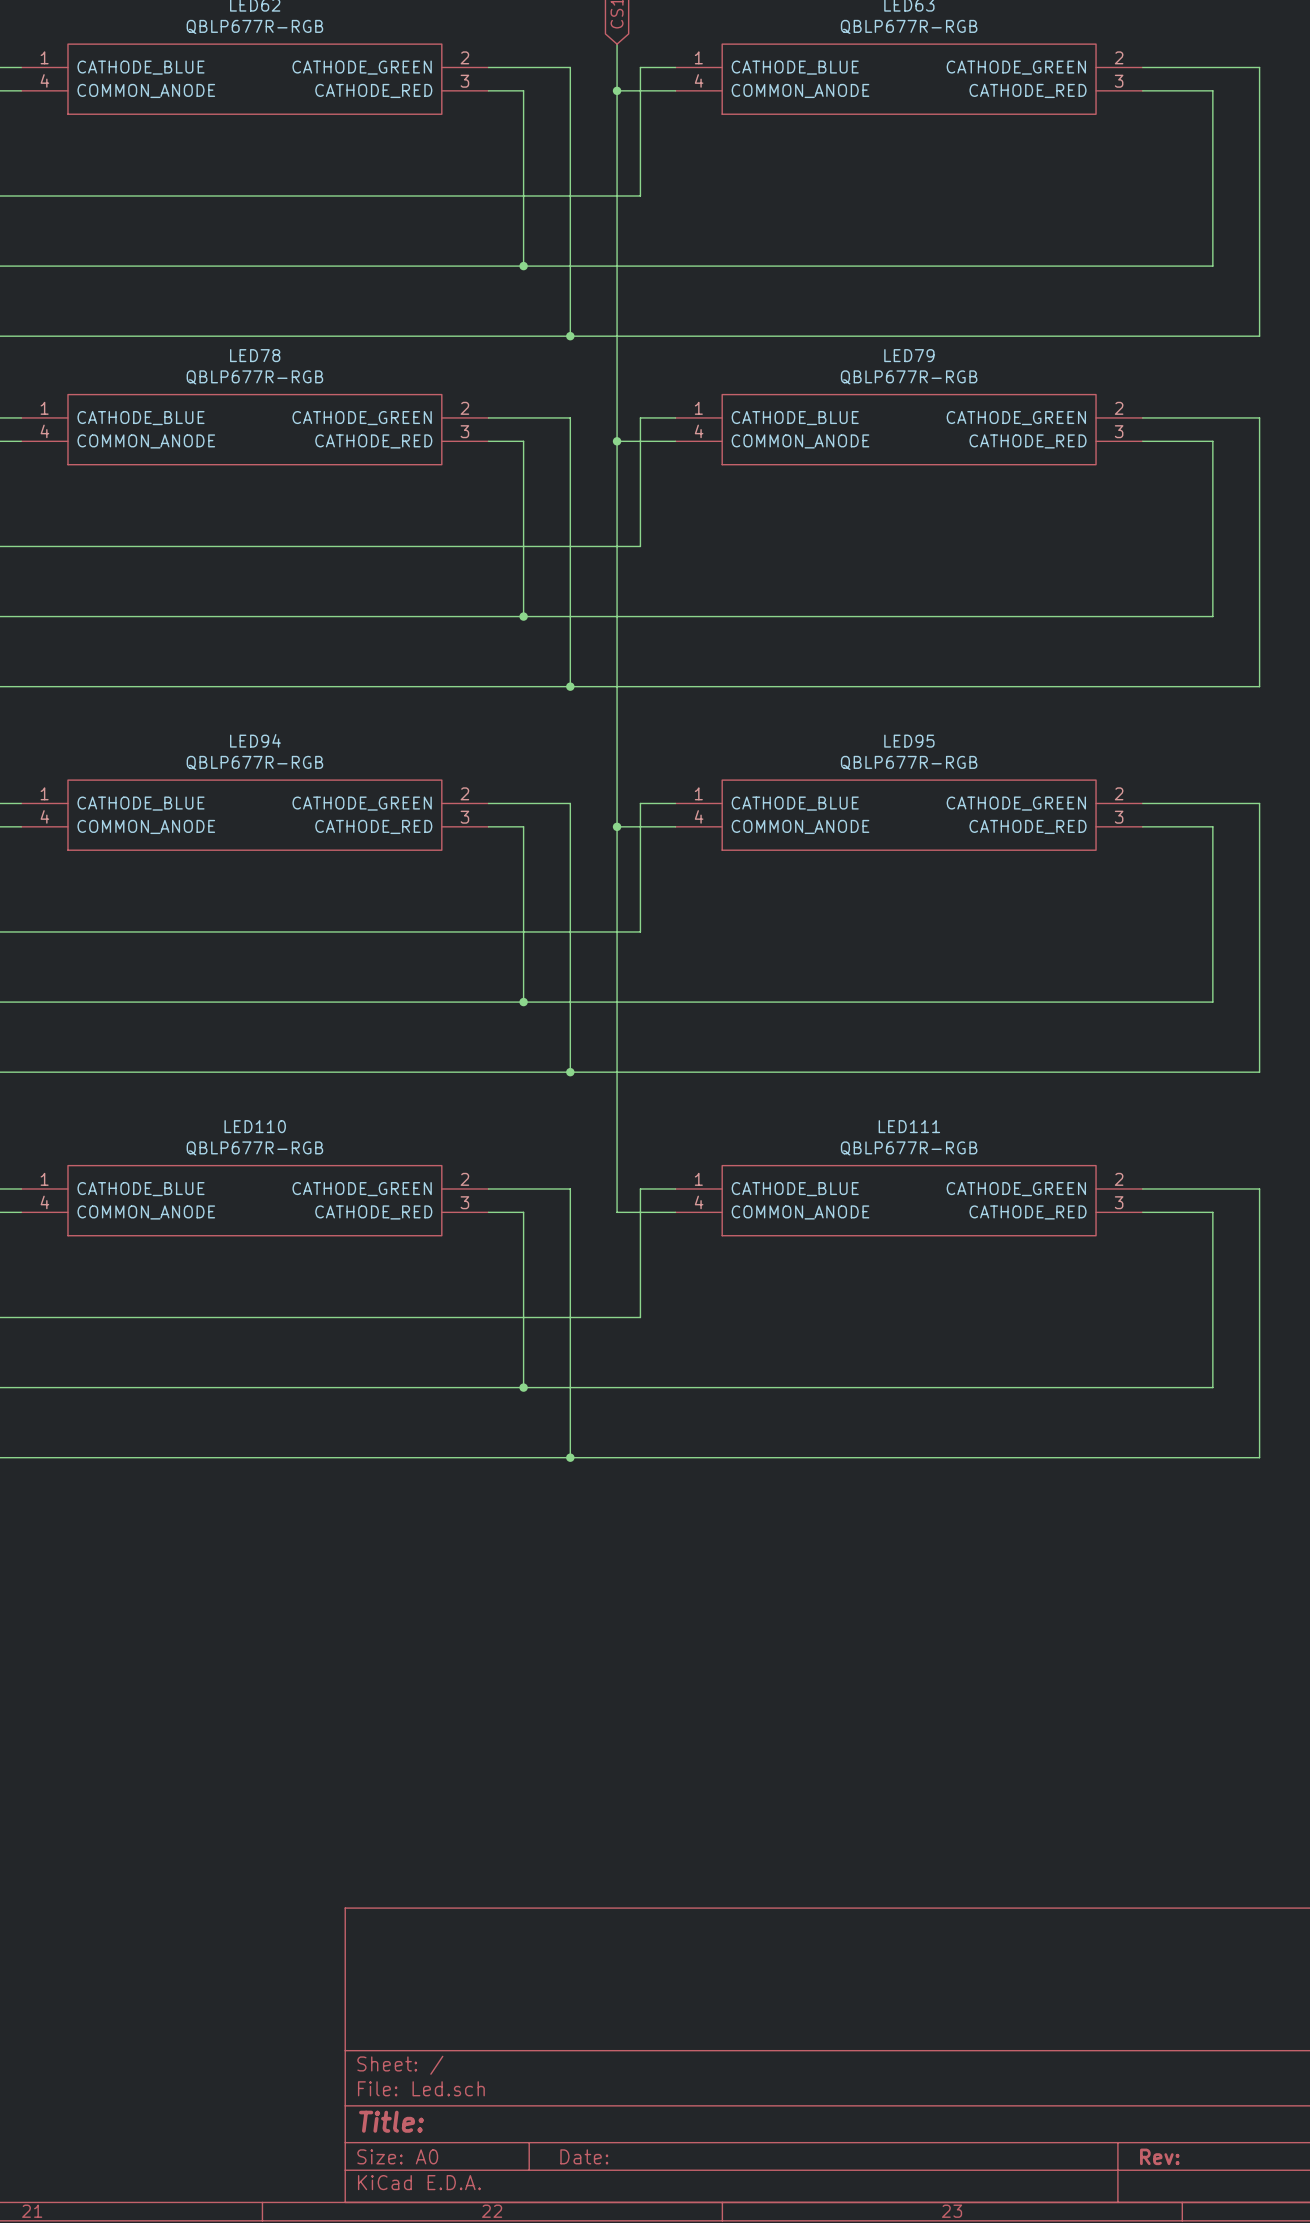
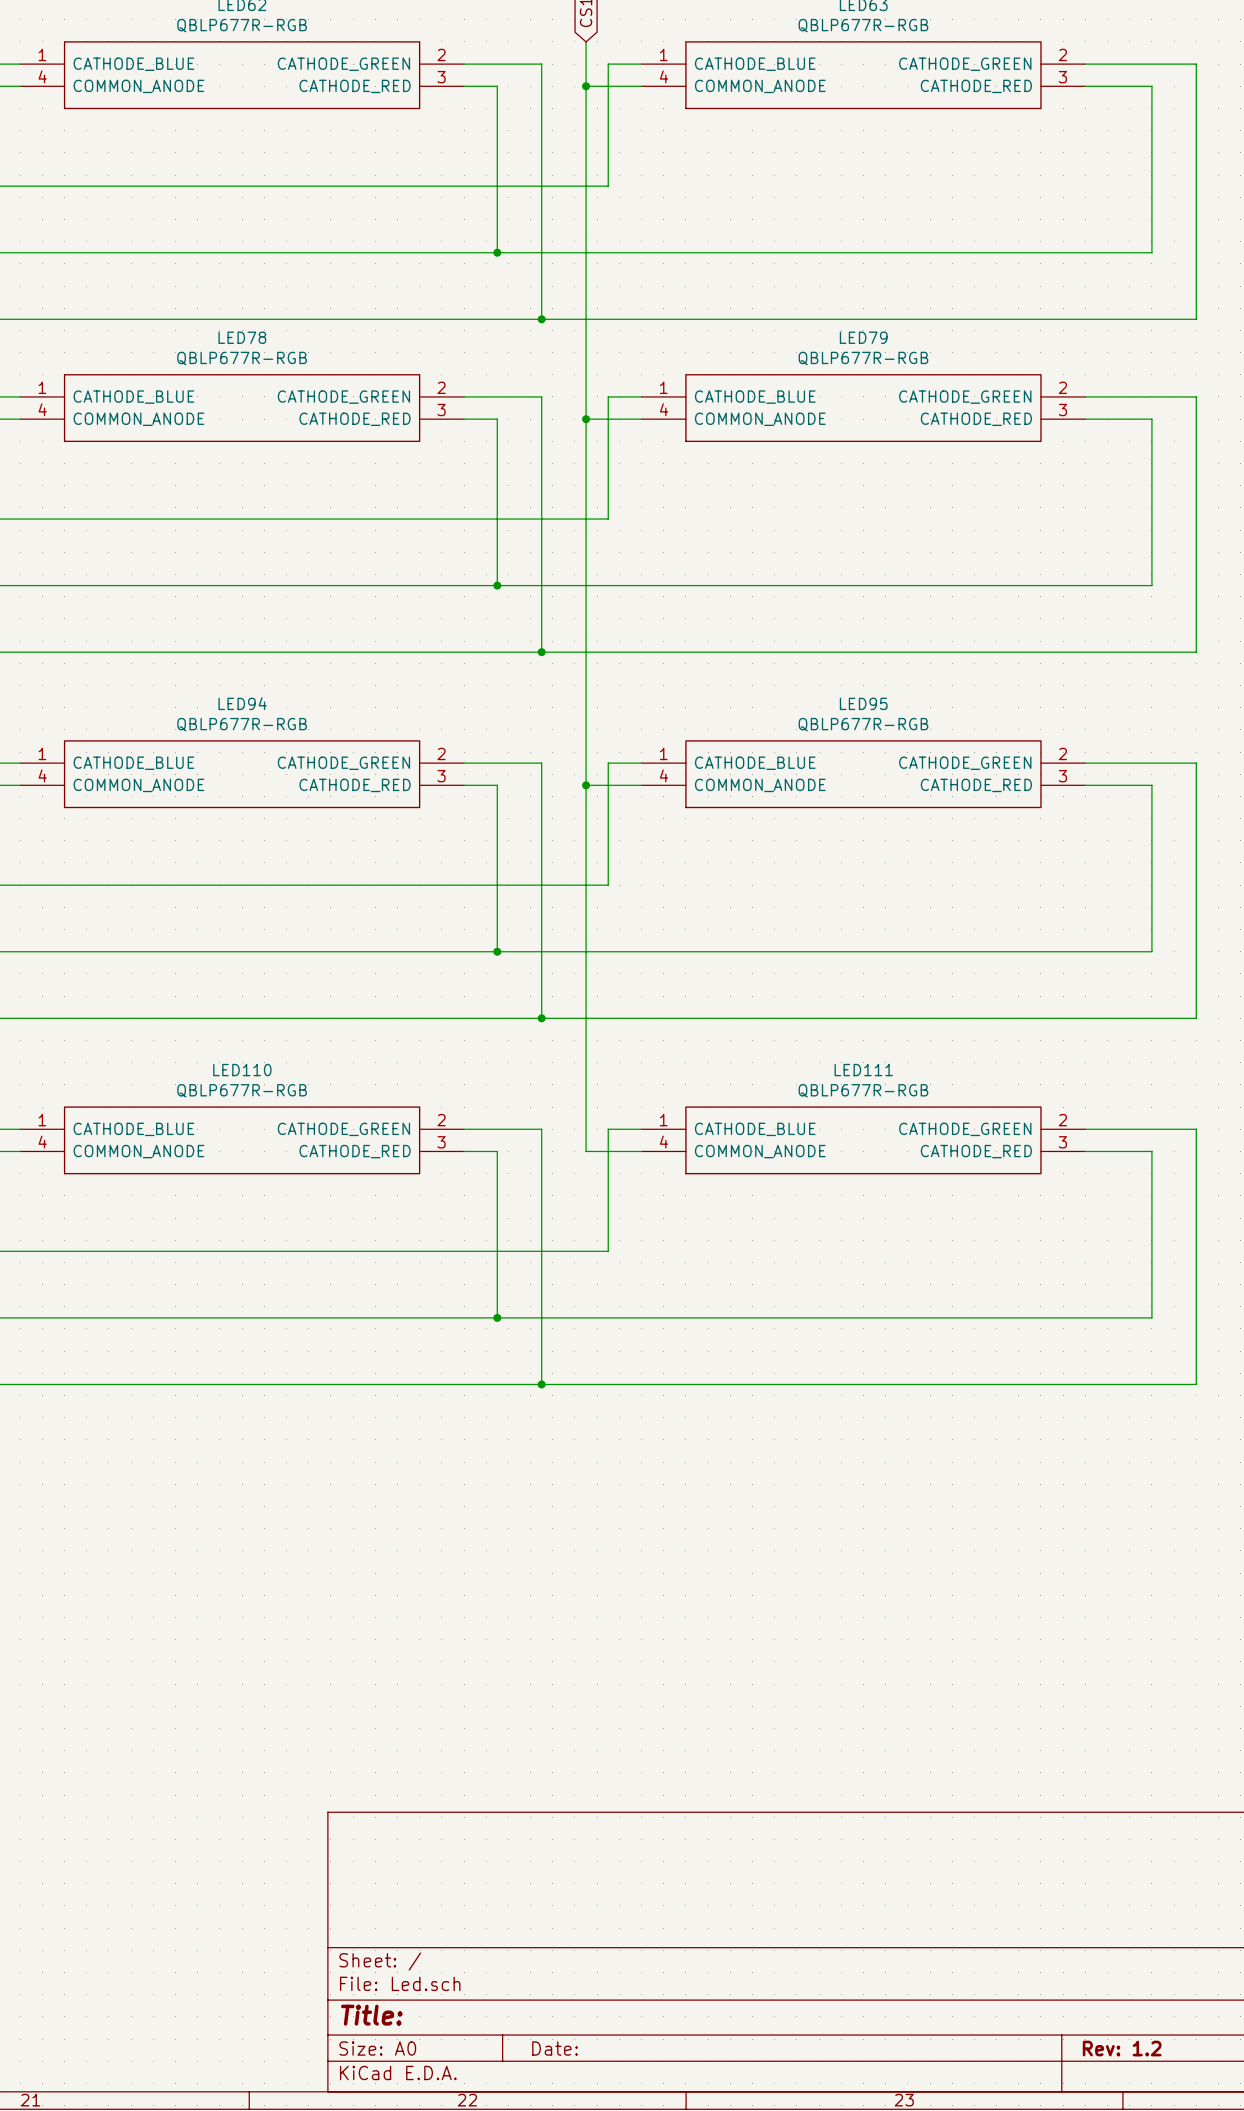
title block: Rev: (1159, 2156) -> Rev: 1.2 (1122, 2048)

